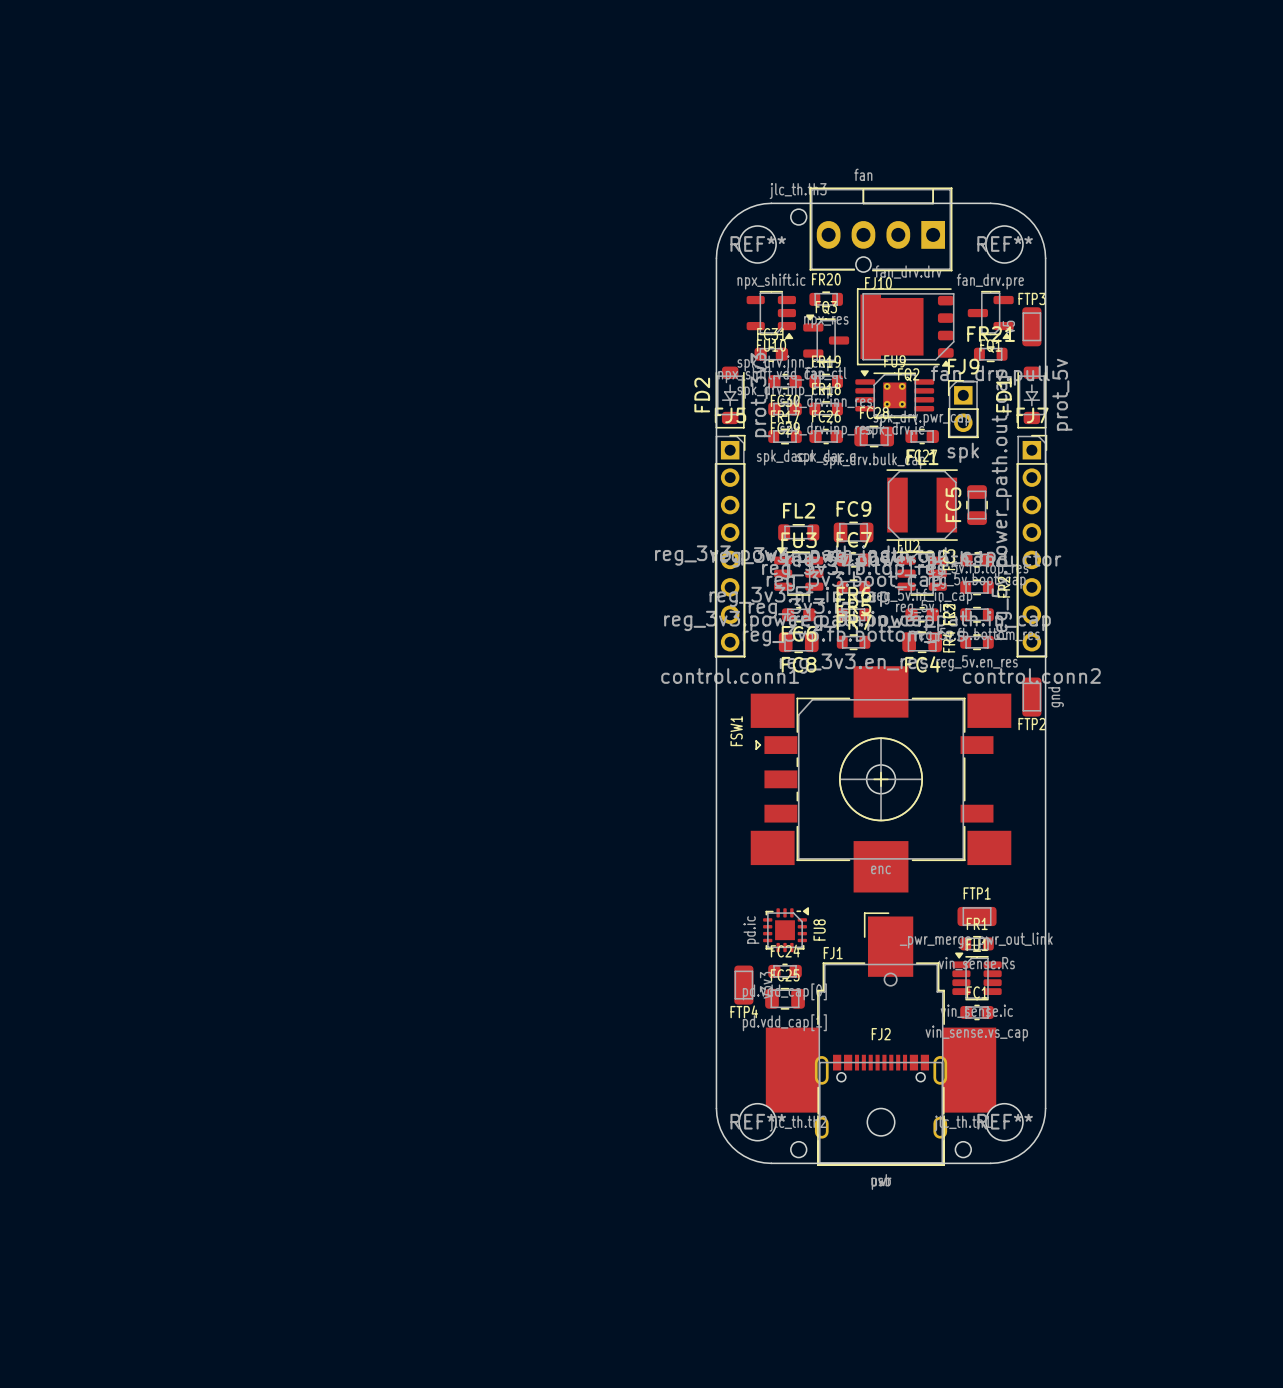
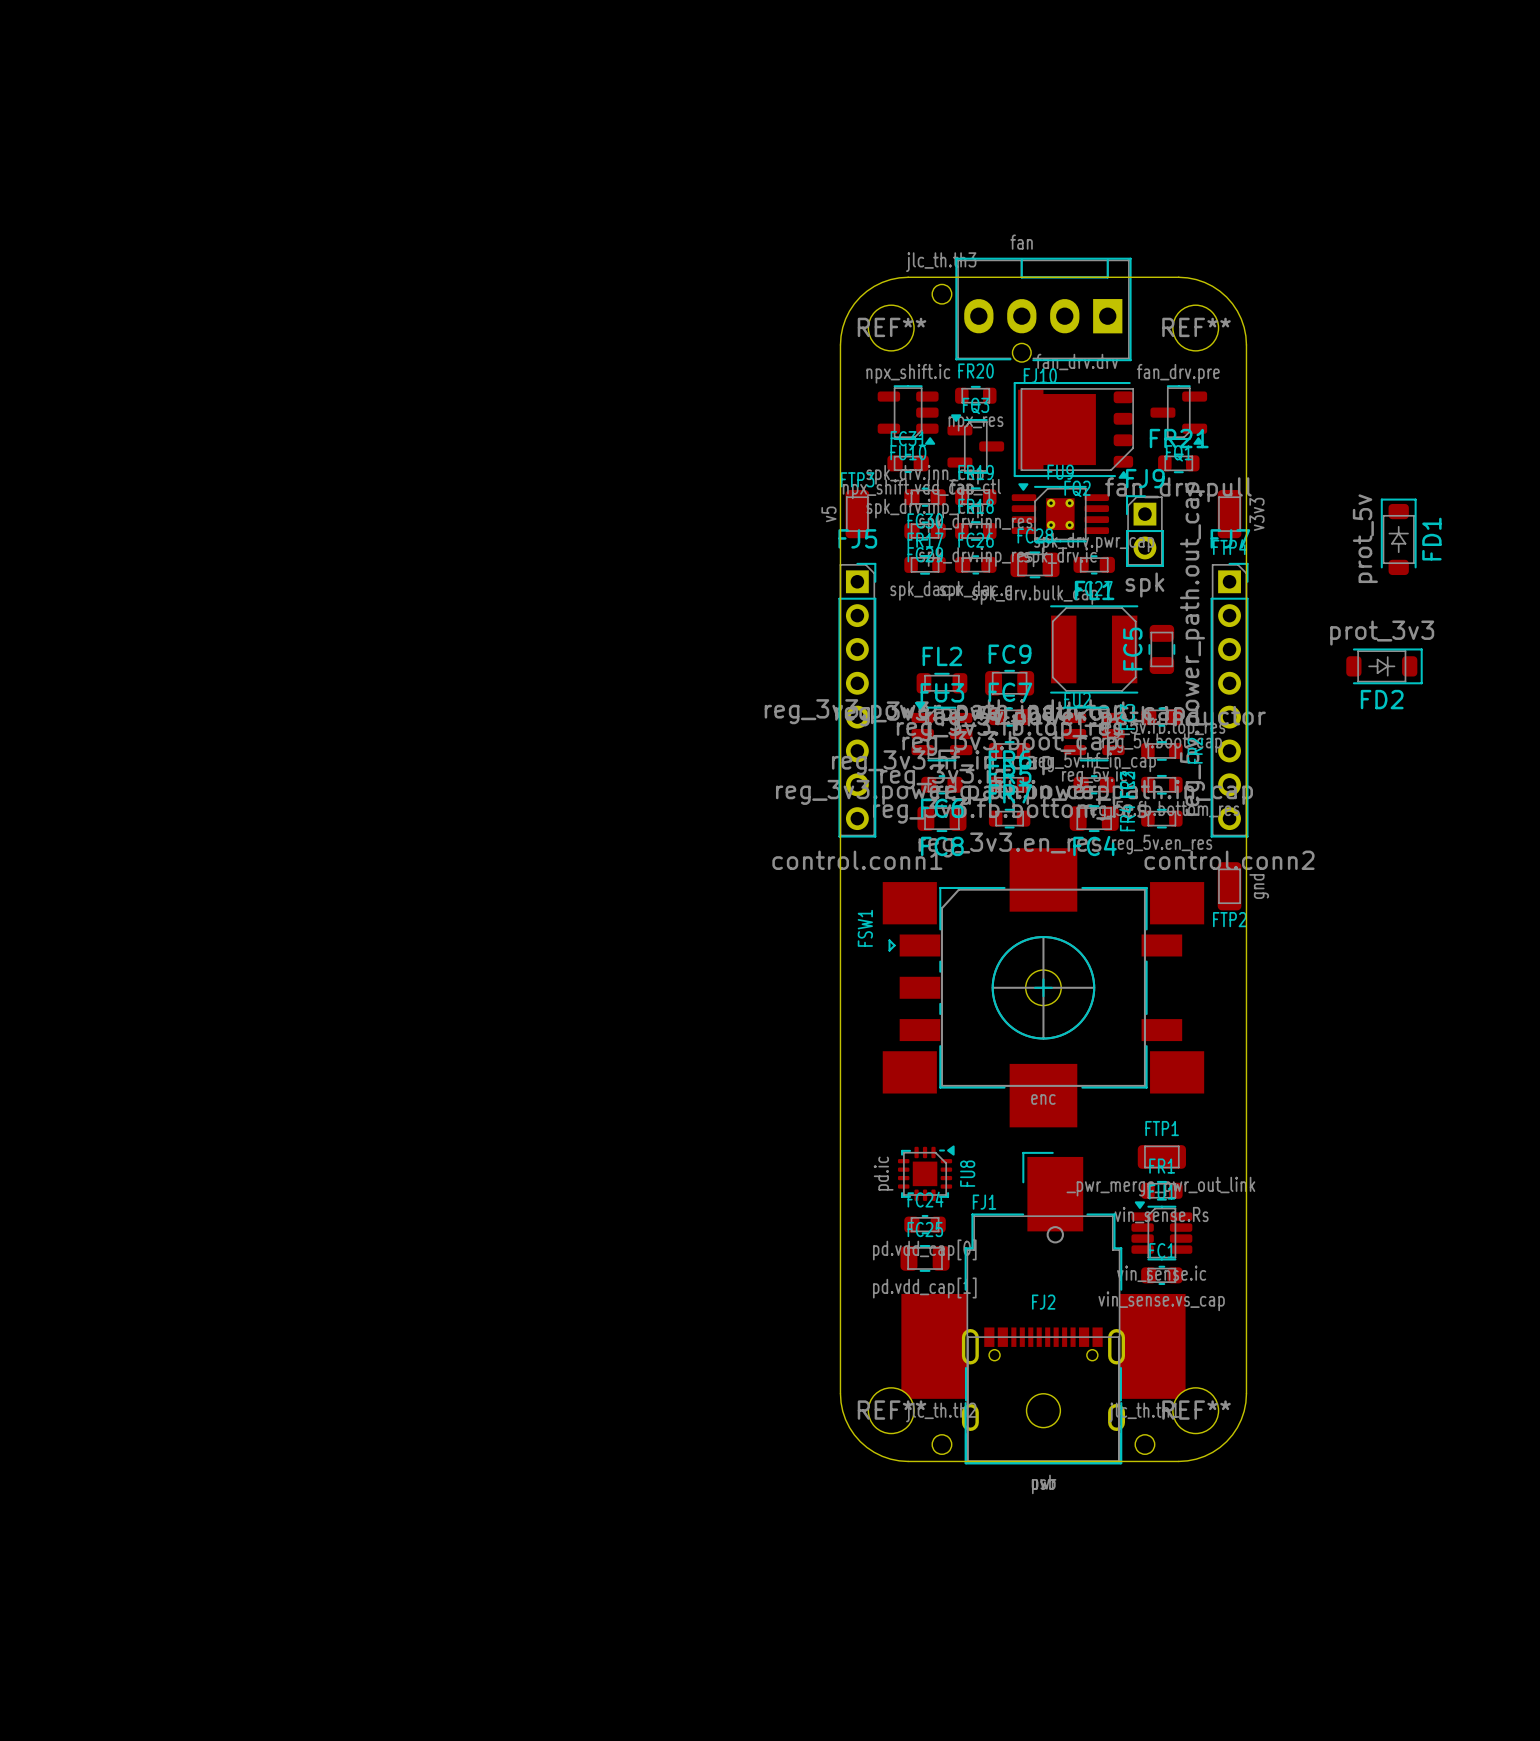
FTP3 position: (1031, 326) -> (857, 514)
FD2 rotation: 0° (730, 397) -> 90° counterclockwise (1384, 666)
FD2 position: (730, 397) -> (1384, 666)
FD1 rotation: 0° (1031, 397) -> 180° (1398, 536)
FD1 position: (1031, 397) -> (1398, 536)
FTP4 position: (743, 985) -> (1229, 514)

